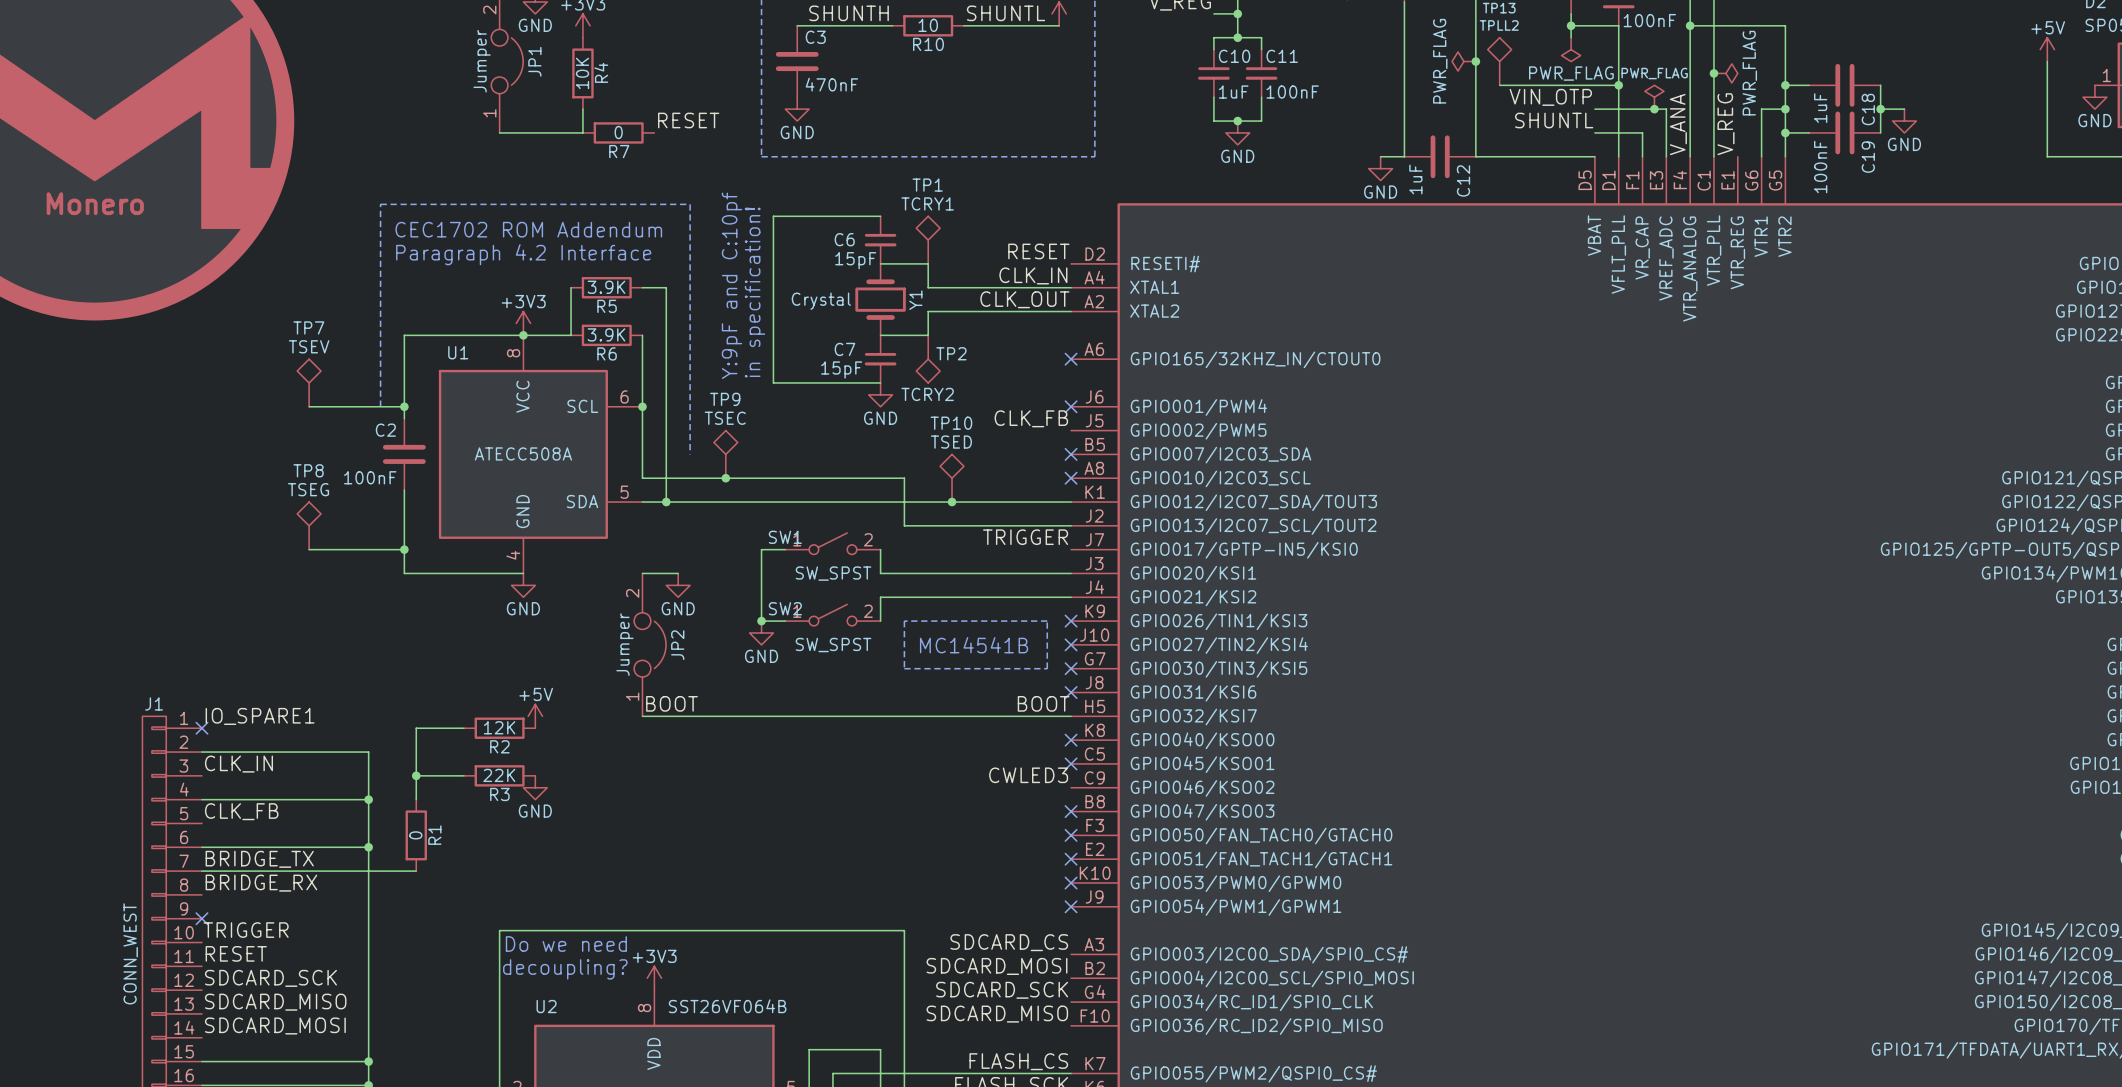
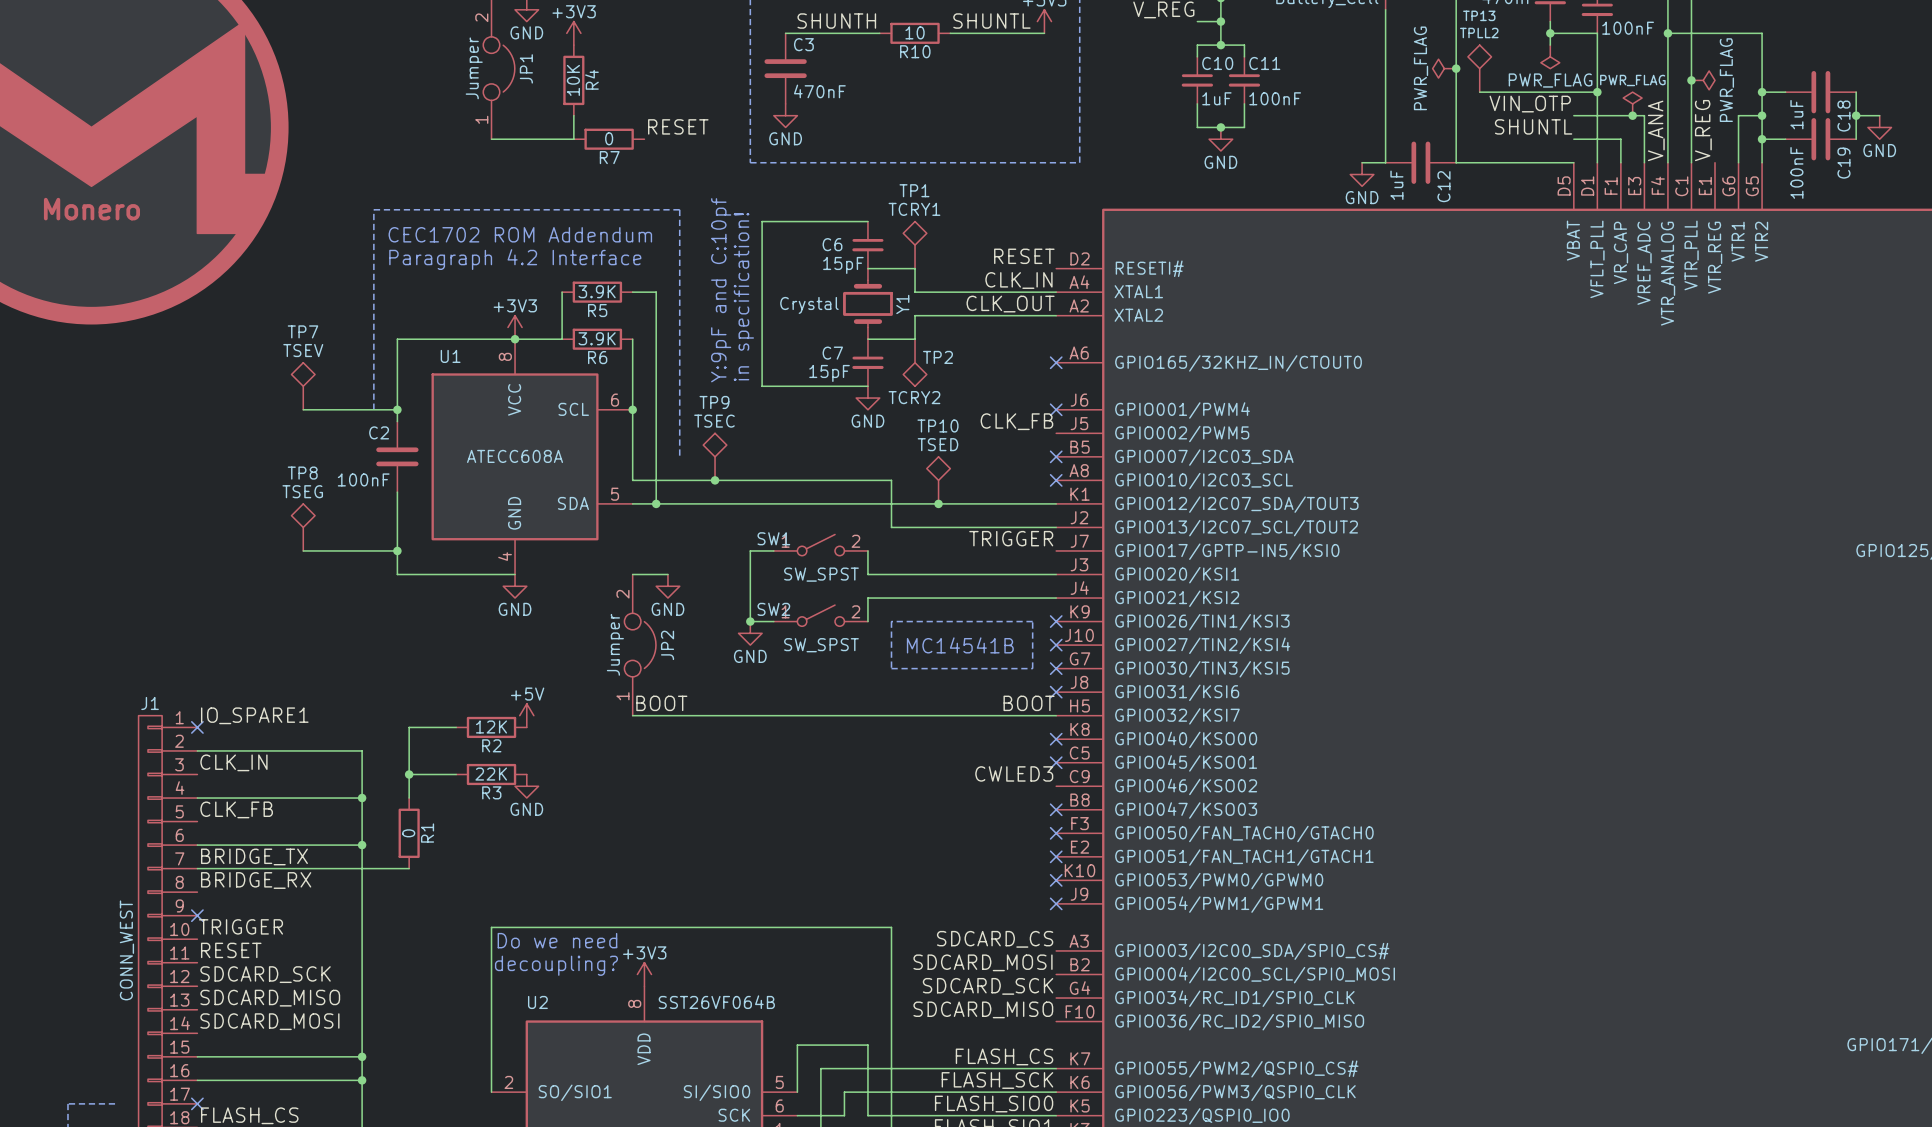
U1 value: ATECC508A (523, 453) -> ATECC608A (515, 456)

